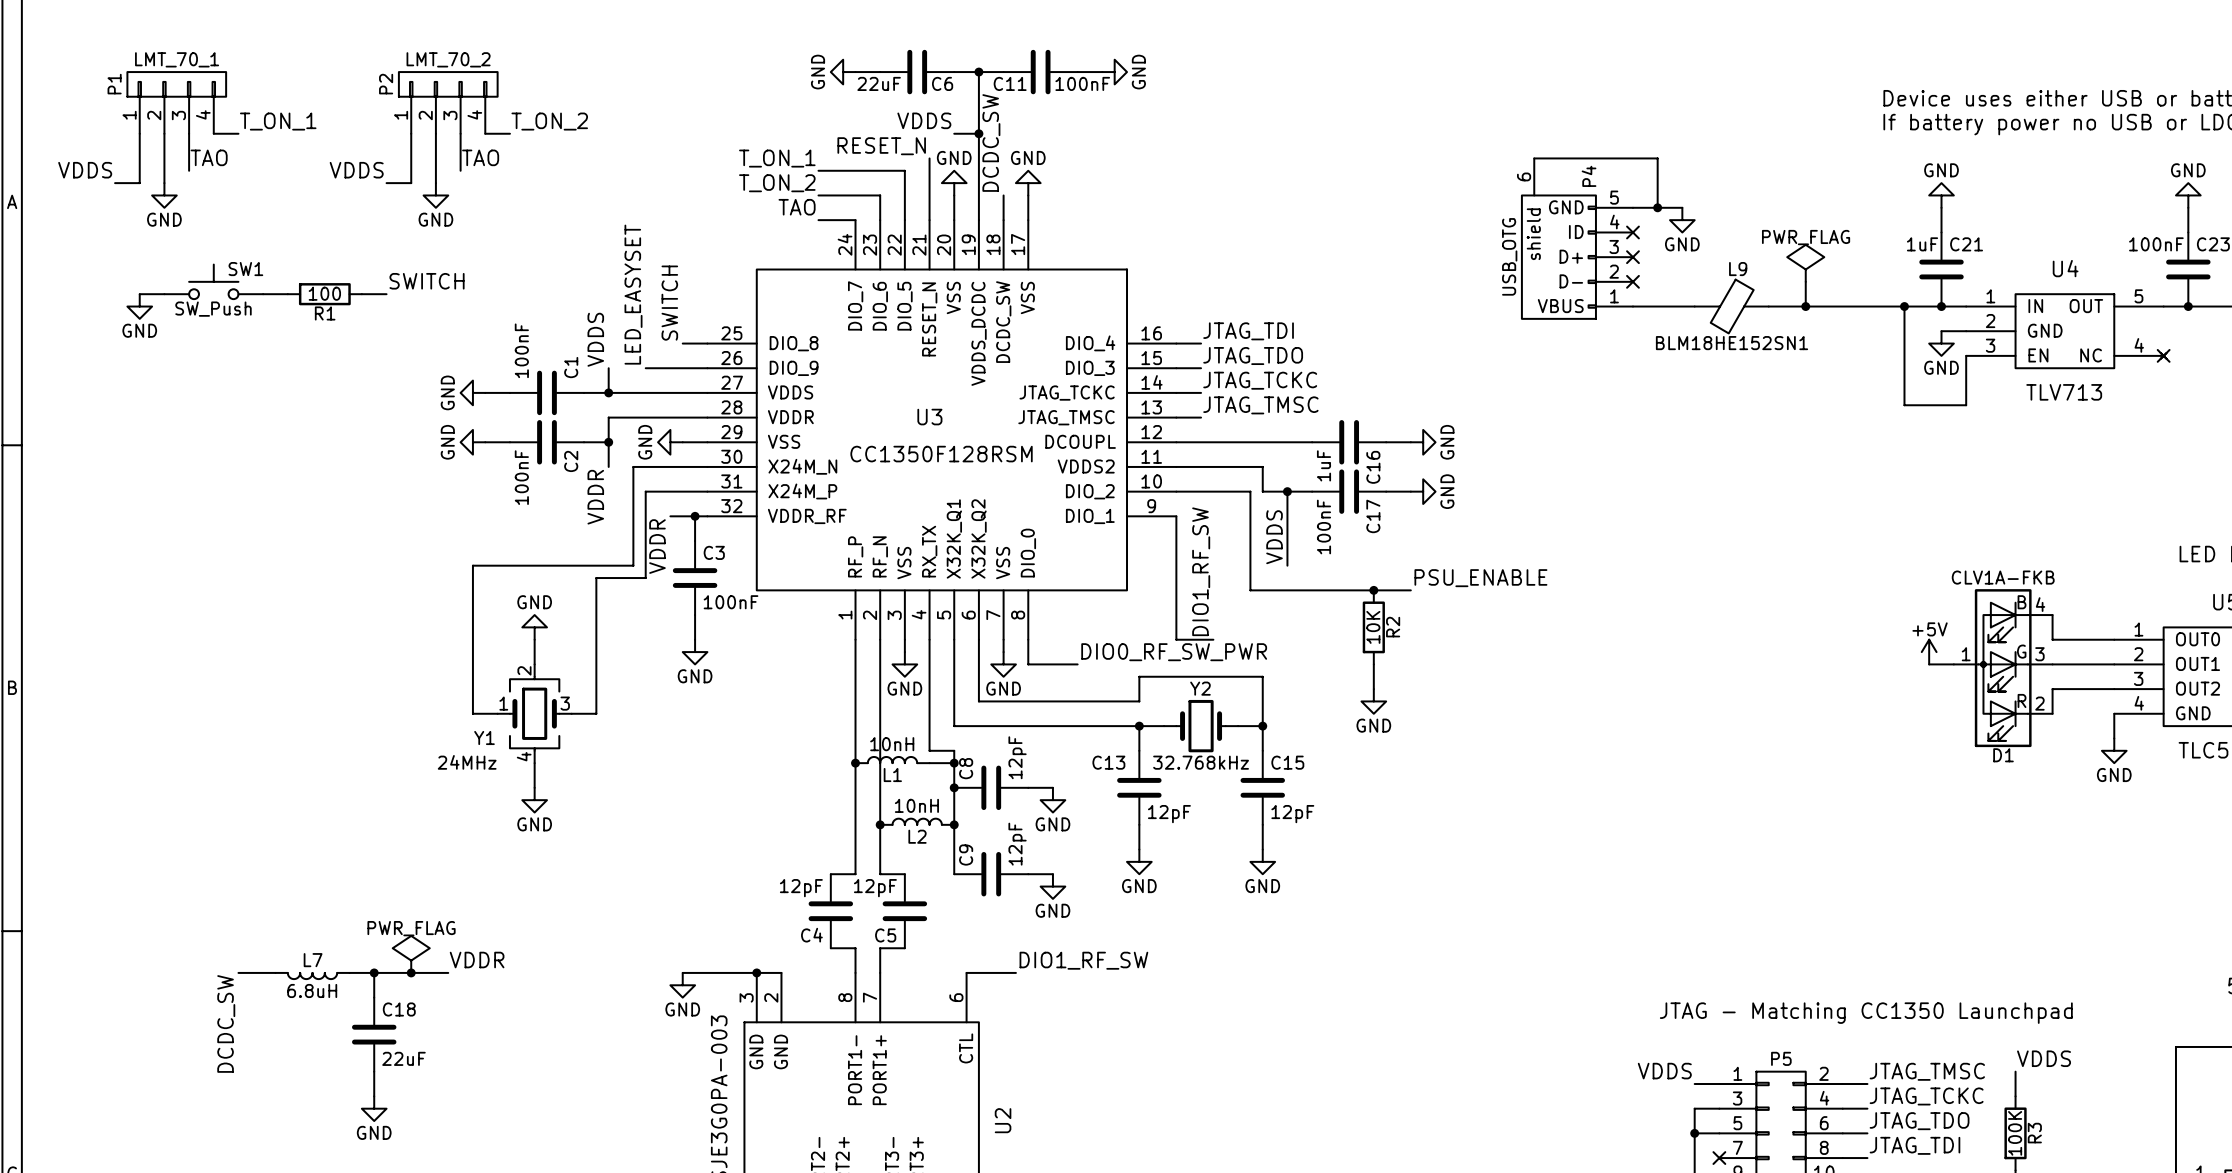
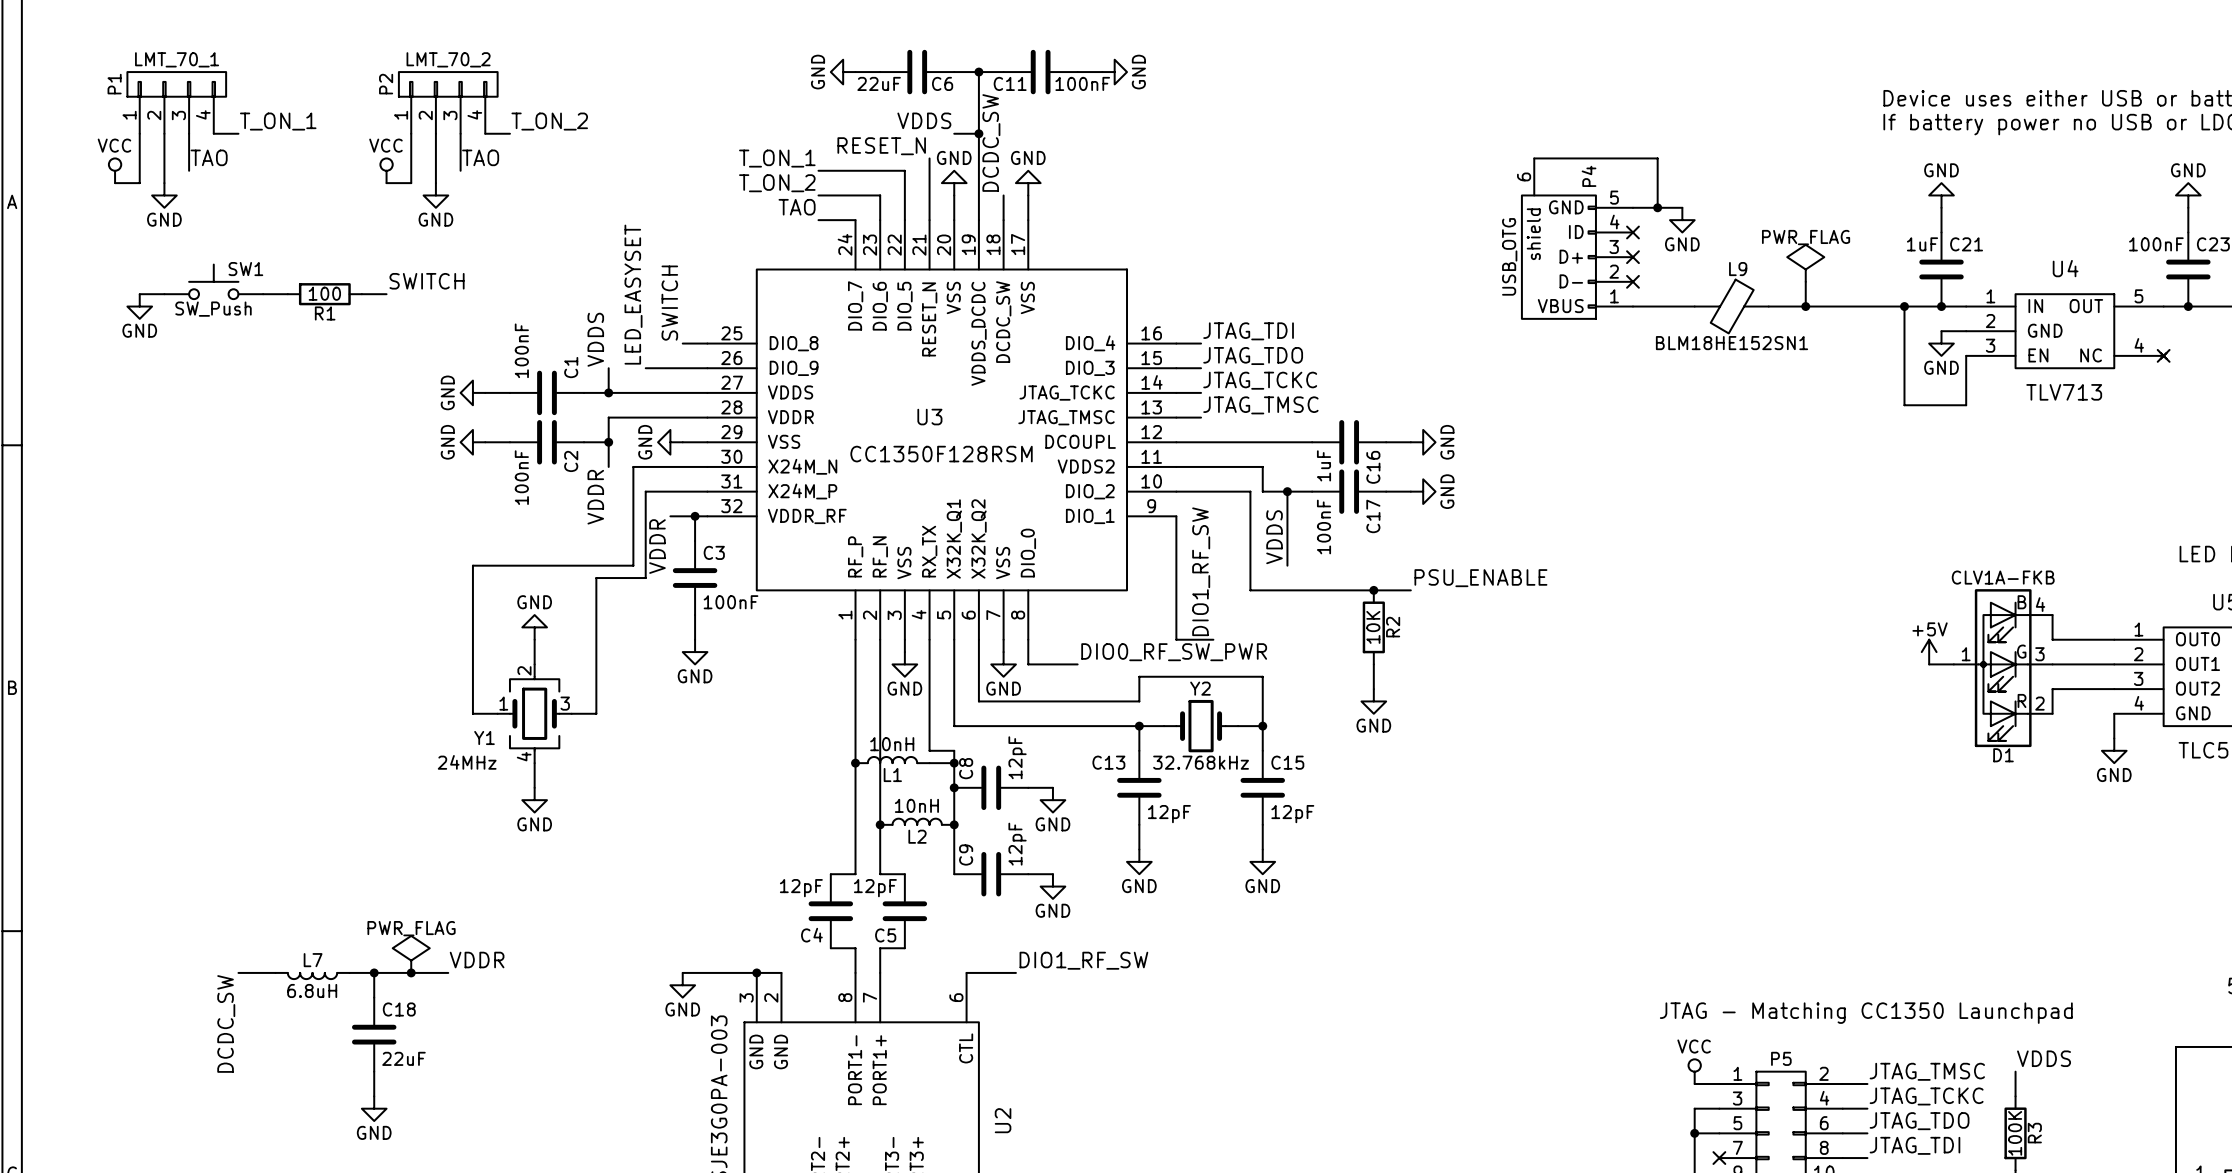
label: VDDS (85, 170) -> none
power symbol: none -> VCC (115, 170)
label: VDDS (356, 170) -> none
power symbol: none -> VCC (386, 170)
label: VDDS (1664, 1071) -> none
power symbol: none -> VCC (1694, 1071)

